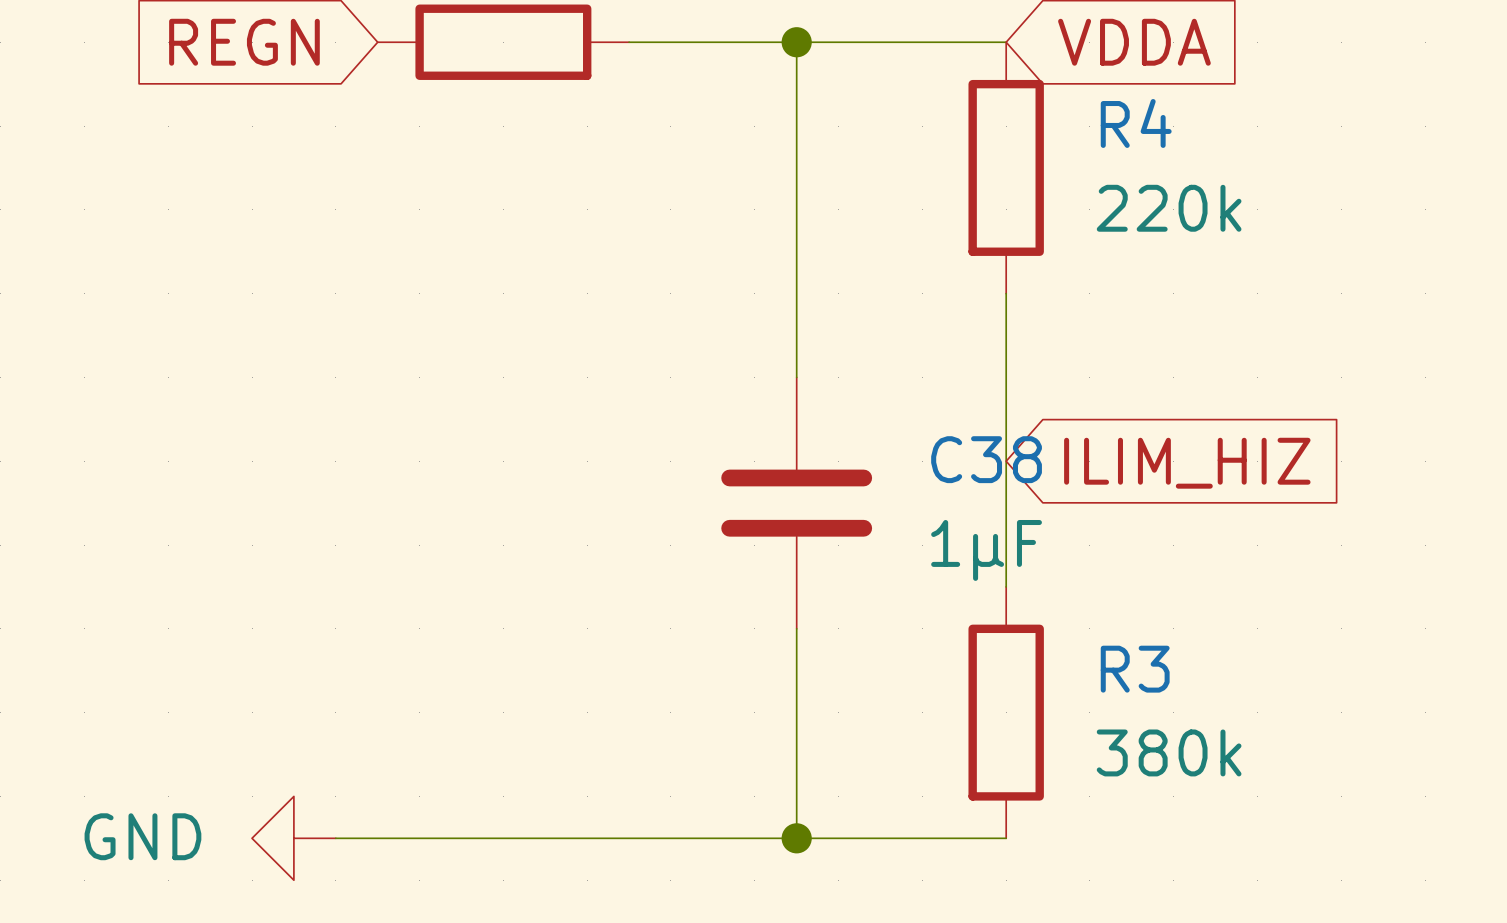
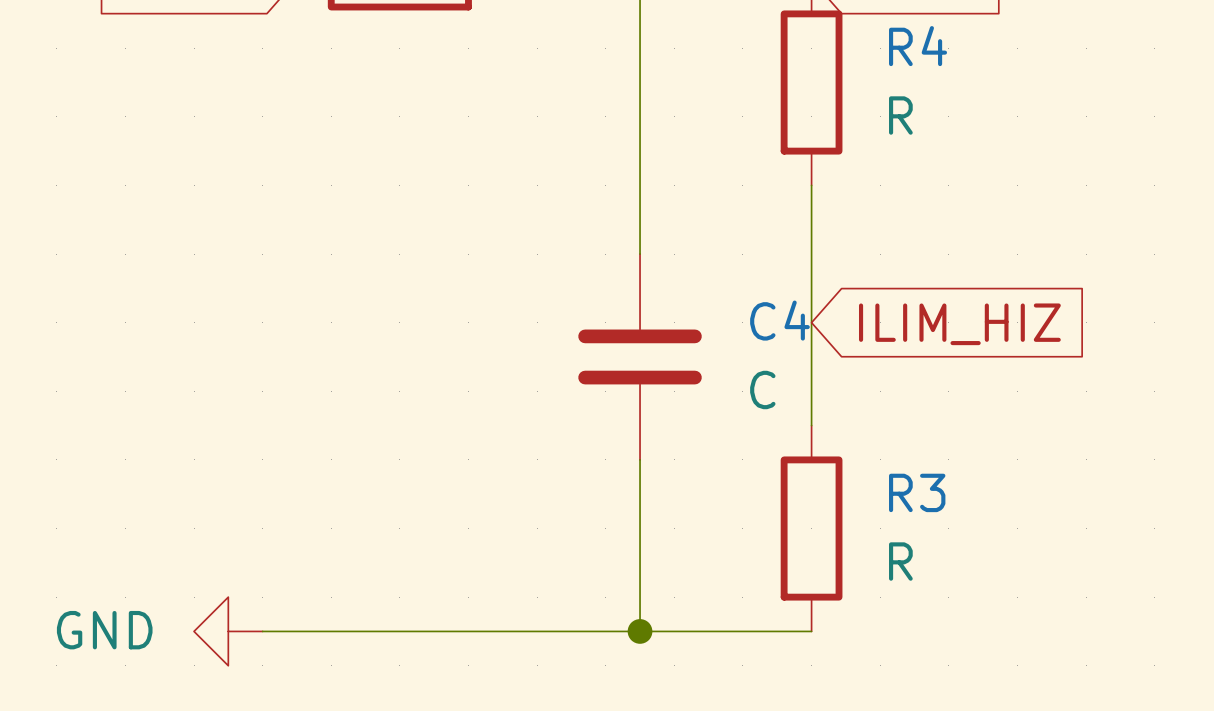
R4 value: 220k (1169, 208) -> R (900, 115)
C38 name: C38 (986, 459) -> C4 (779, 320)
C38 value: 1µF (986, 550) -> C (762, 389)
R3 value: 380k (1169, 752) -> R (900, 561)

